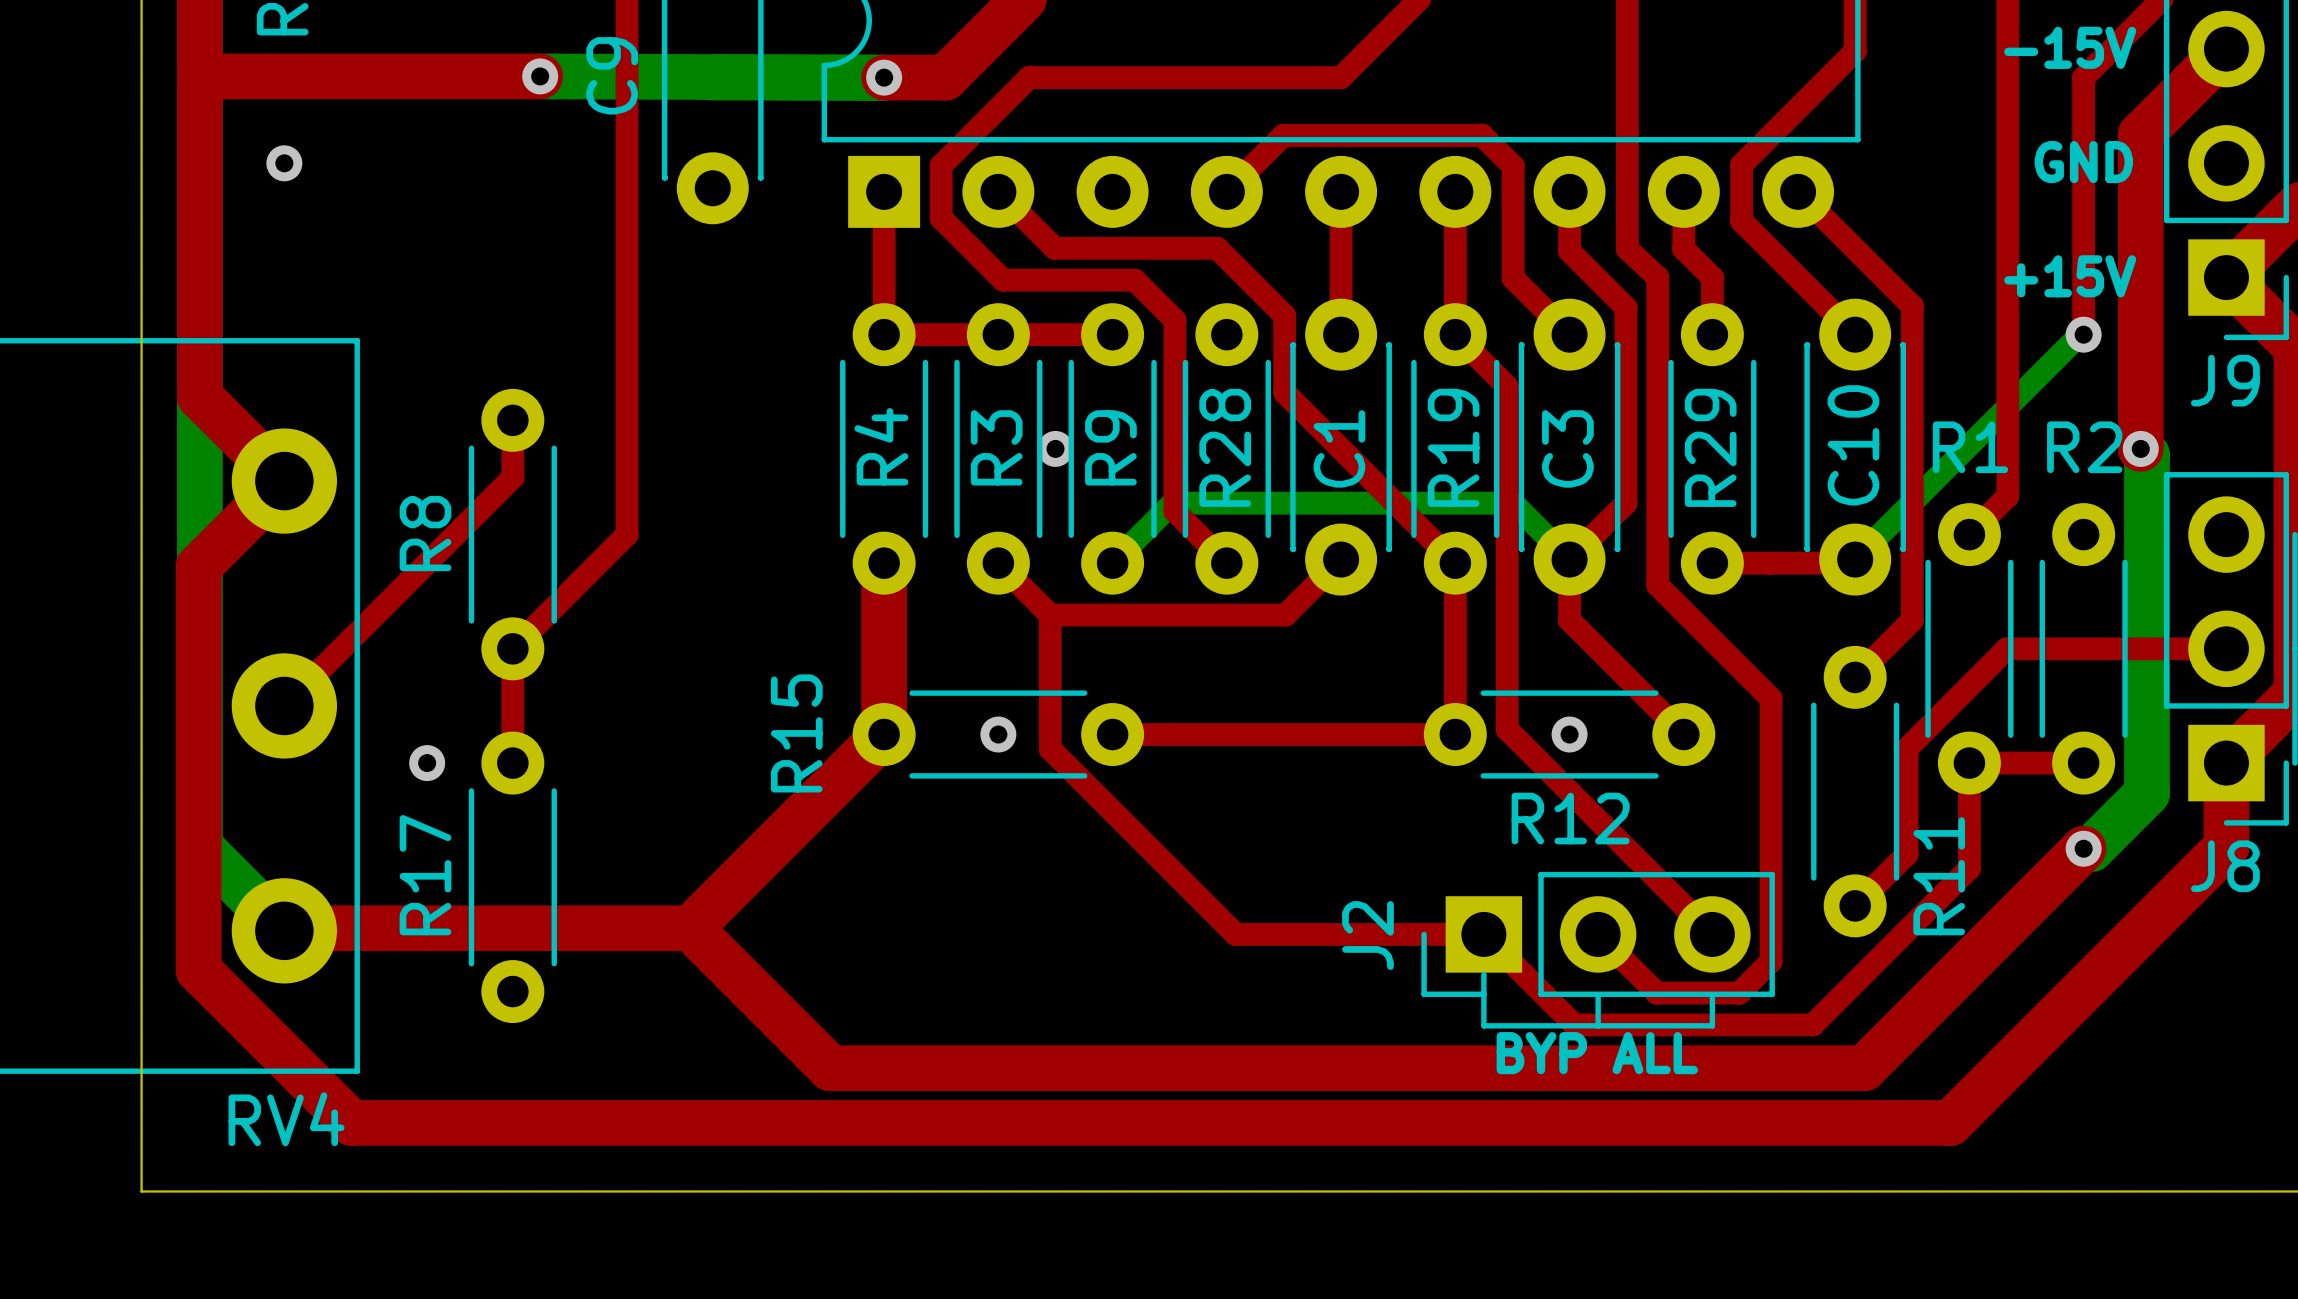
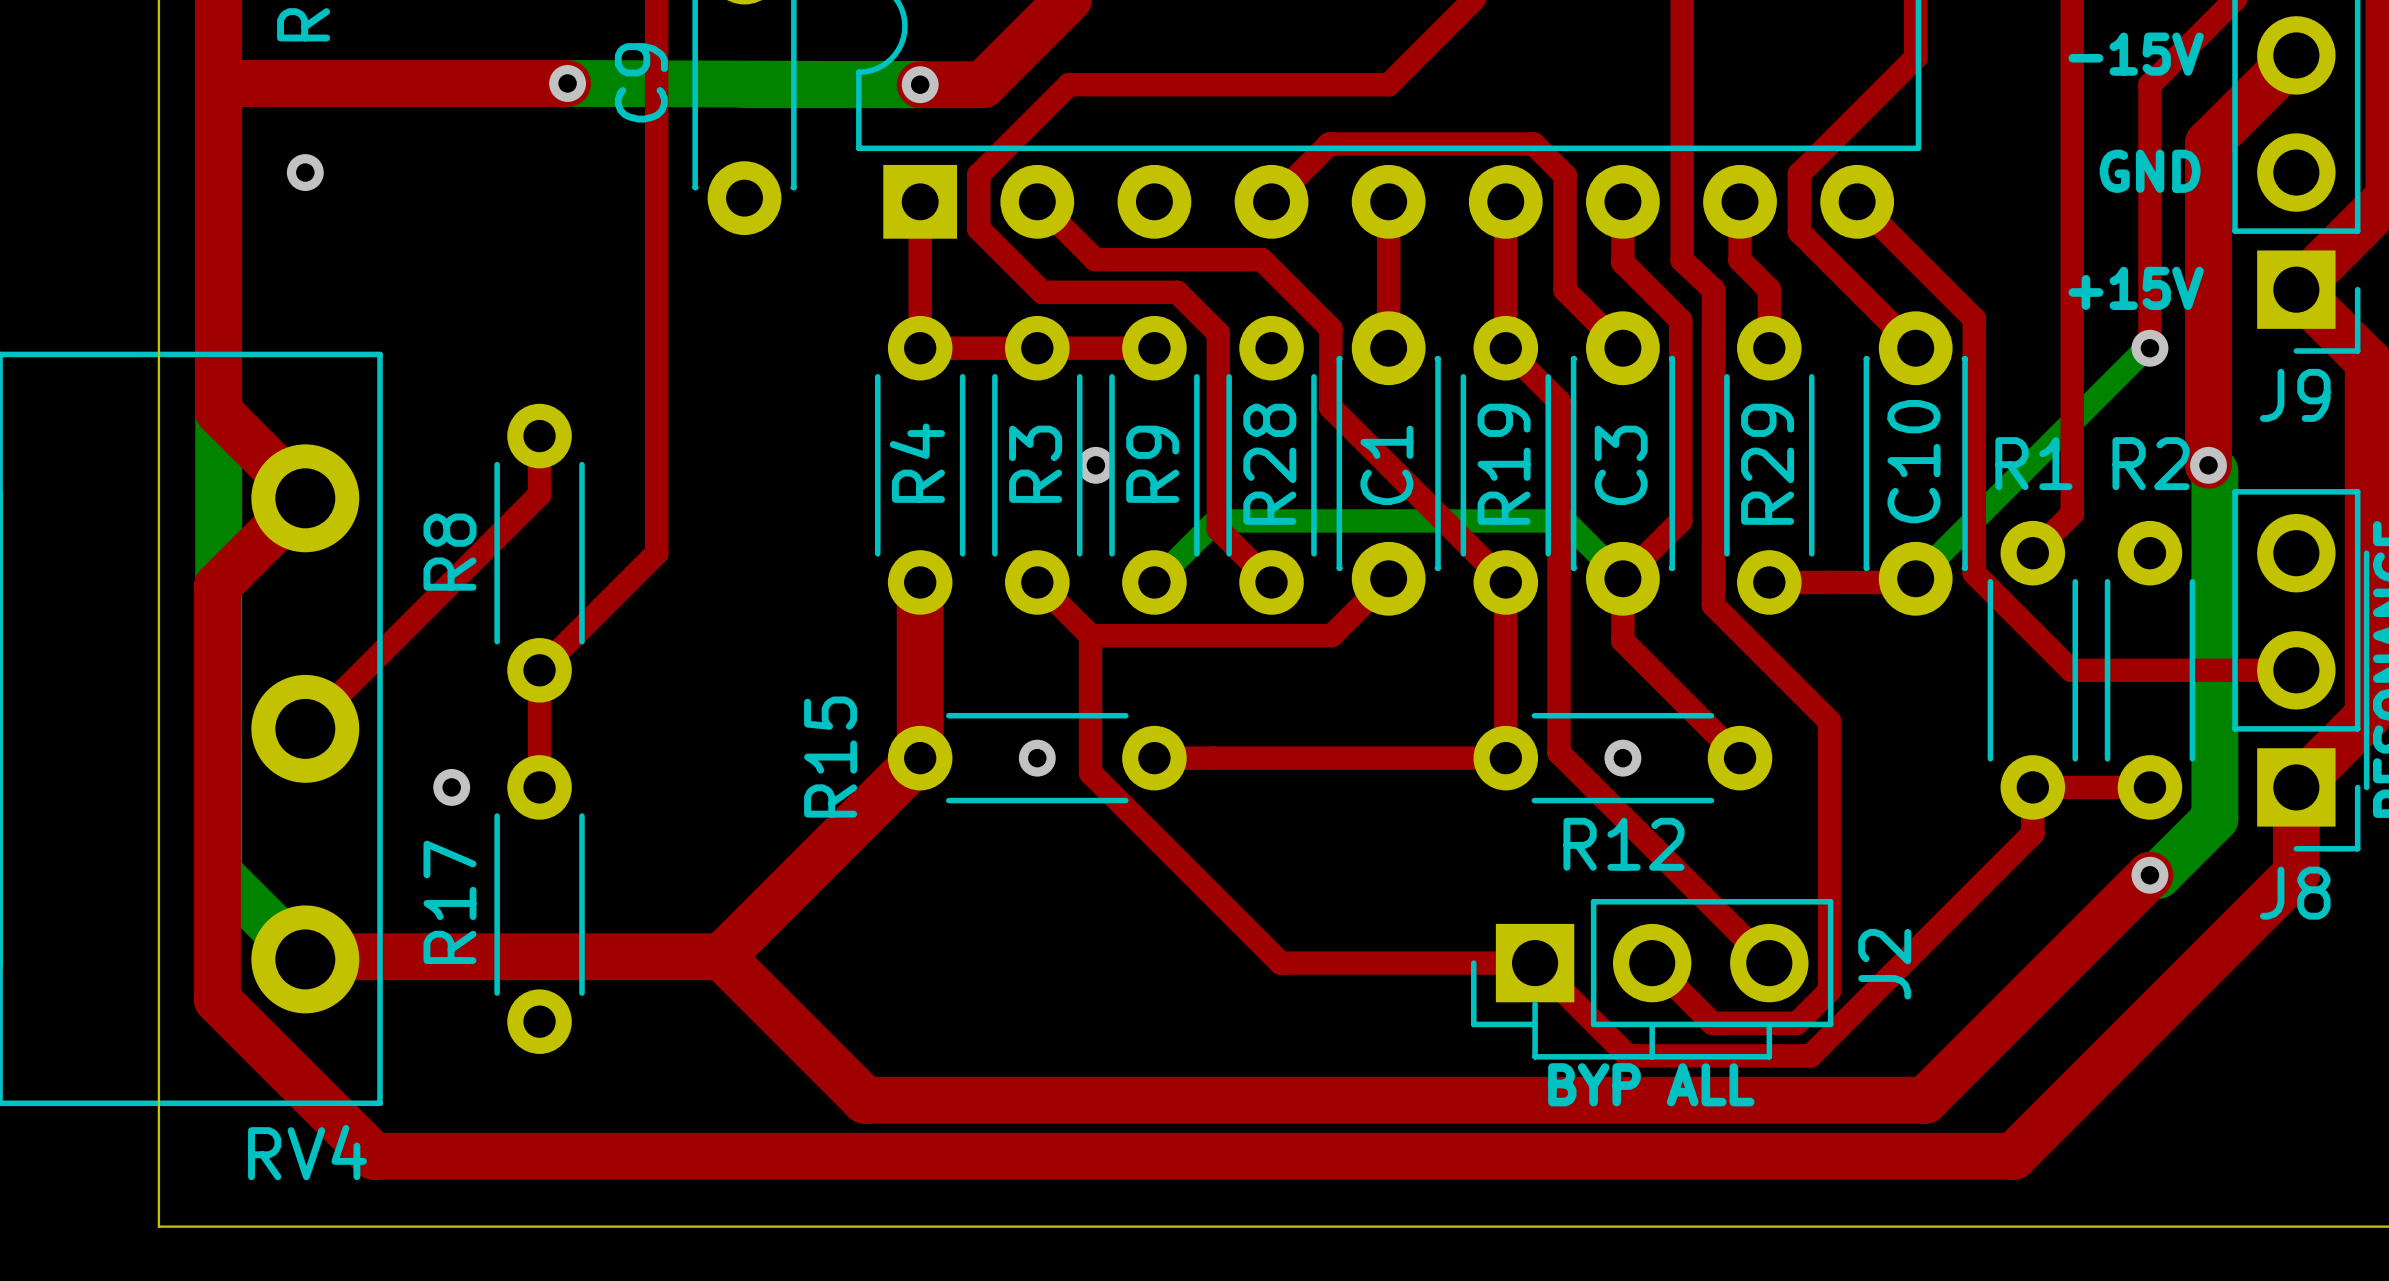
top track: (1912, 554) (1912, 620) (1855, 677) -> (1974, 573) (2071, 670)
top track: (2006, 648) (1907, 748) (1907, 853) (1855, 905) -> none
R11: (1855, 791) -> none
top track: (1969, 808) (1969, 868) (1812, 1024) (1752, 1024) -> (2032, 833) (1810, 1055)
J2 name position: J2 (1367, 935) -> J2 (1884, 964)

